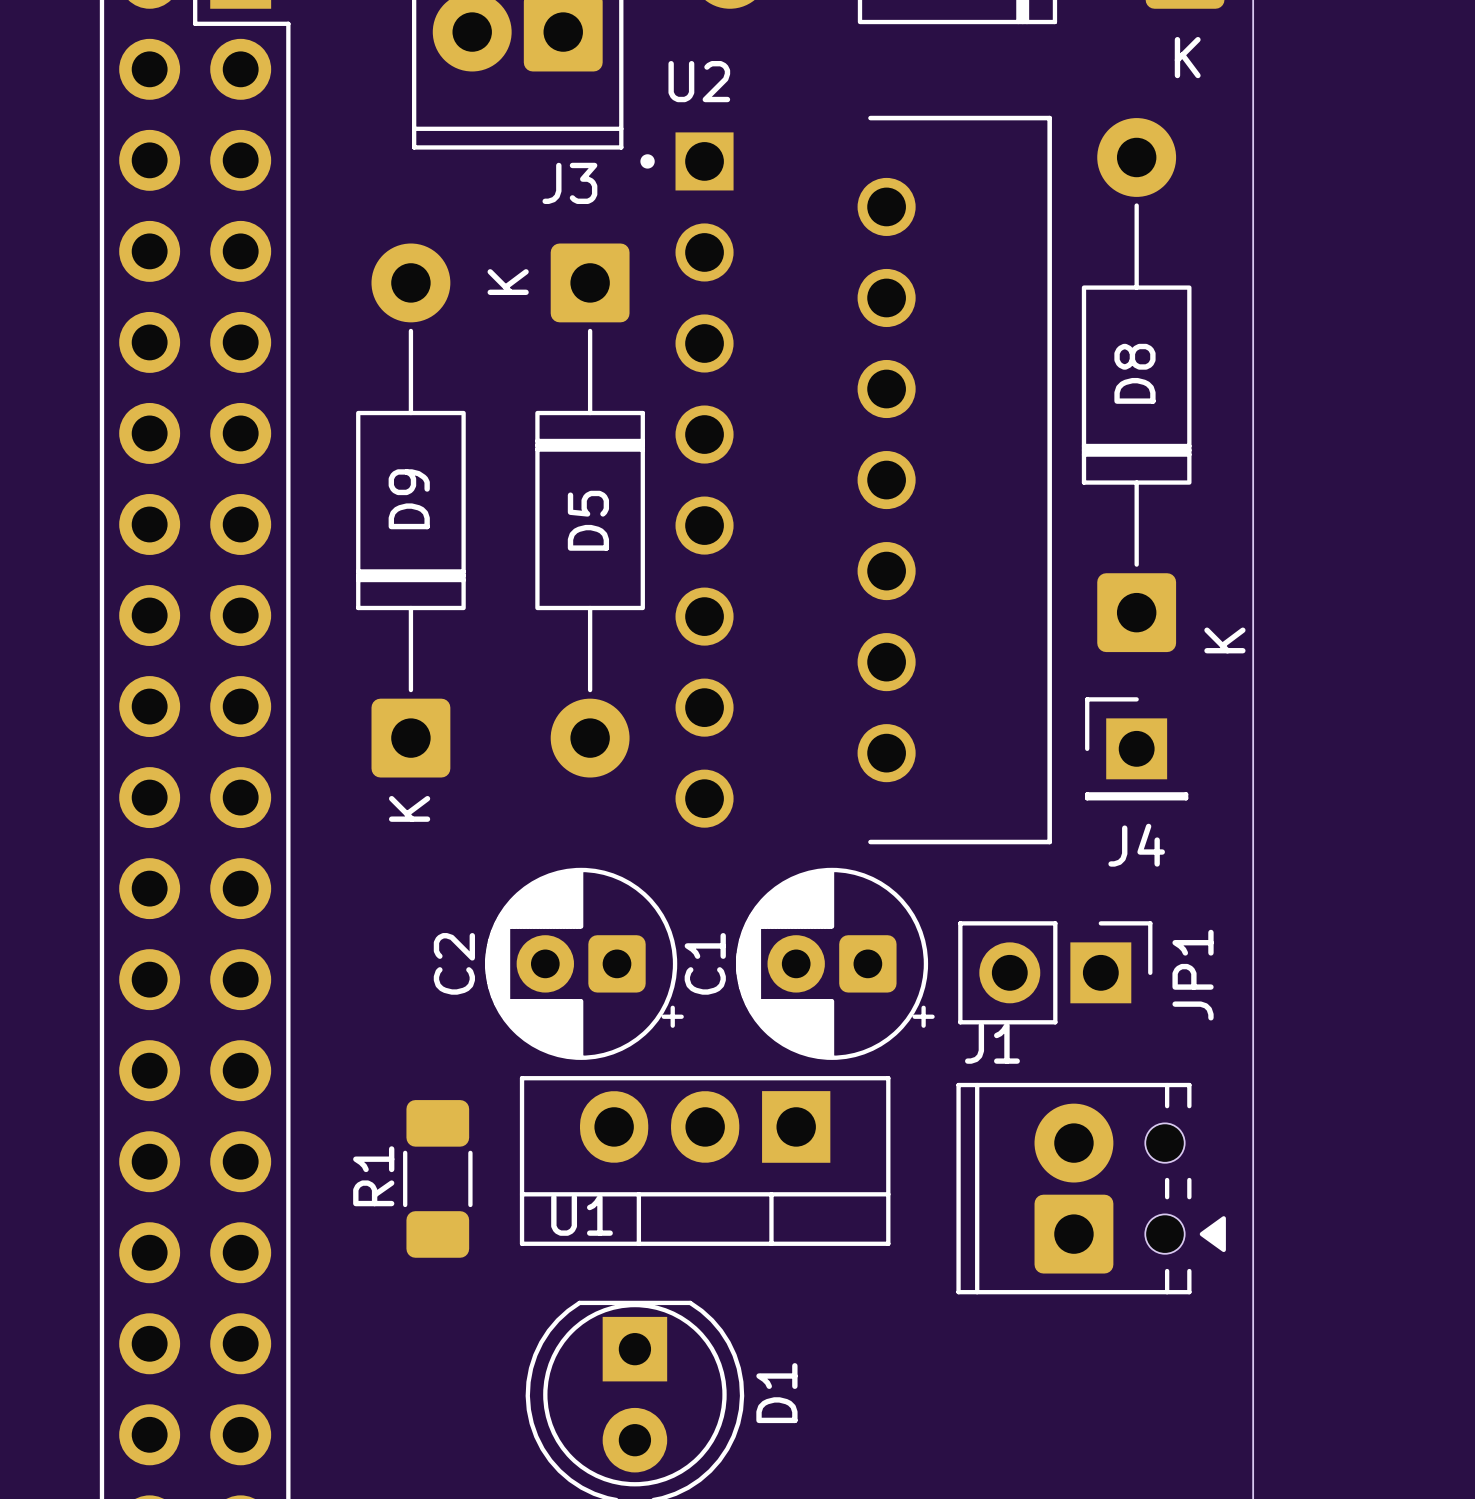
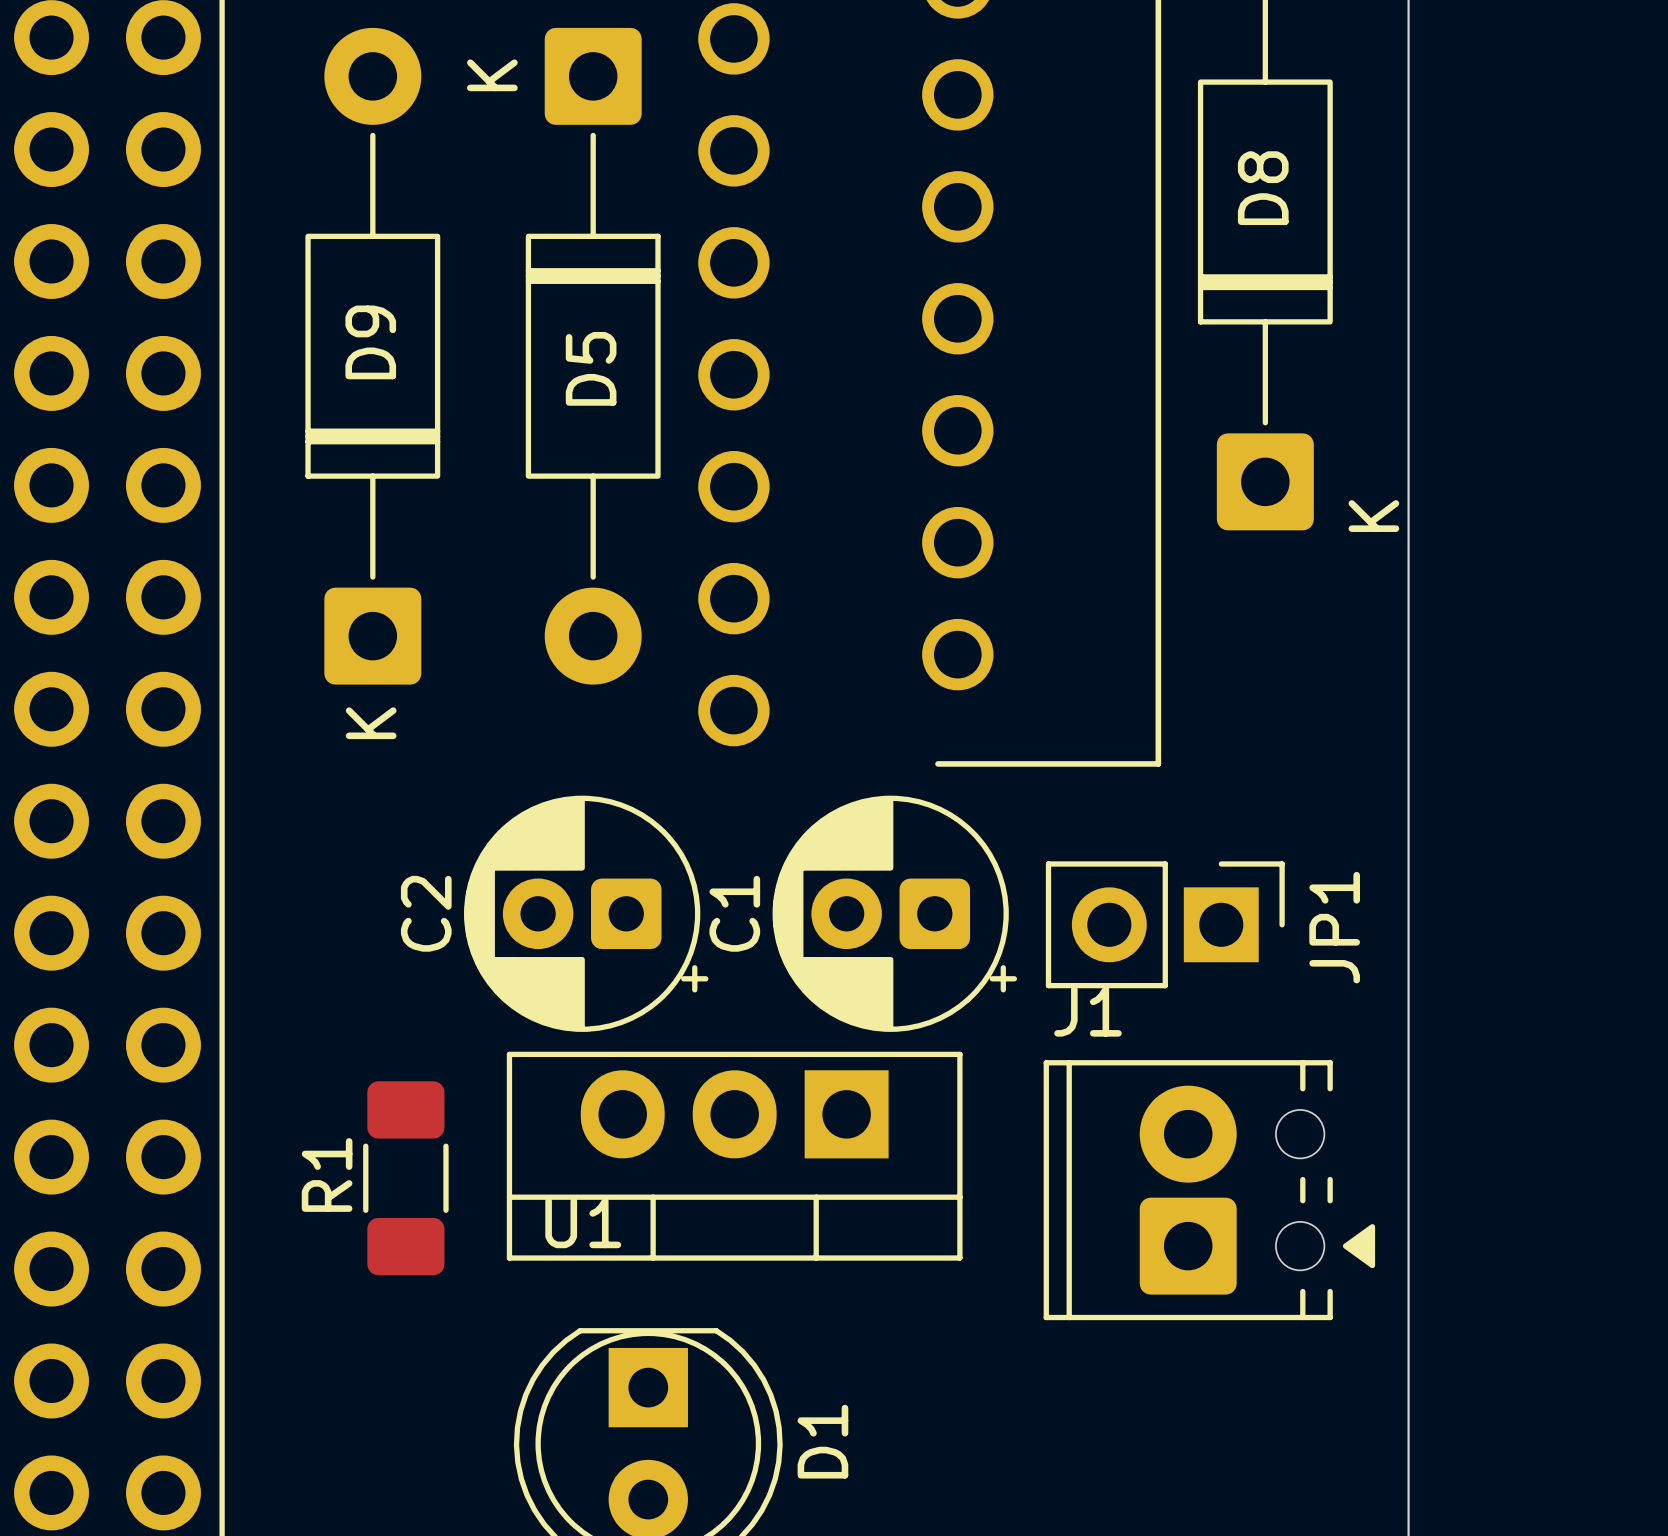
J4: (1136, 748) -> none

